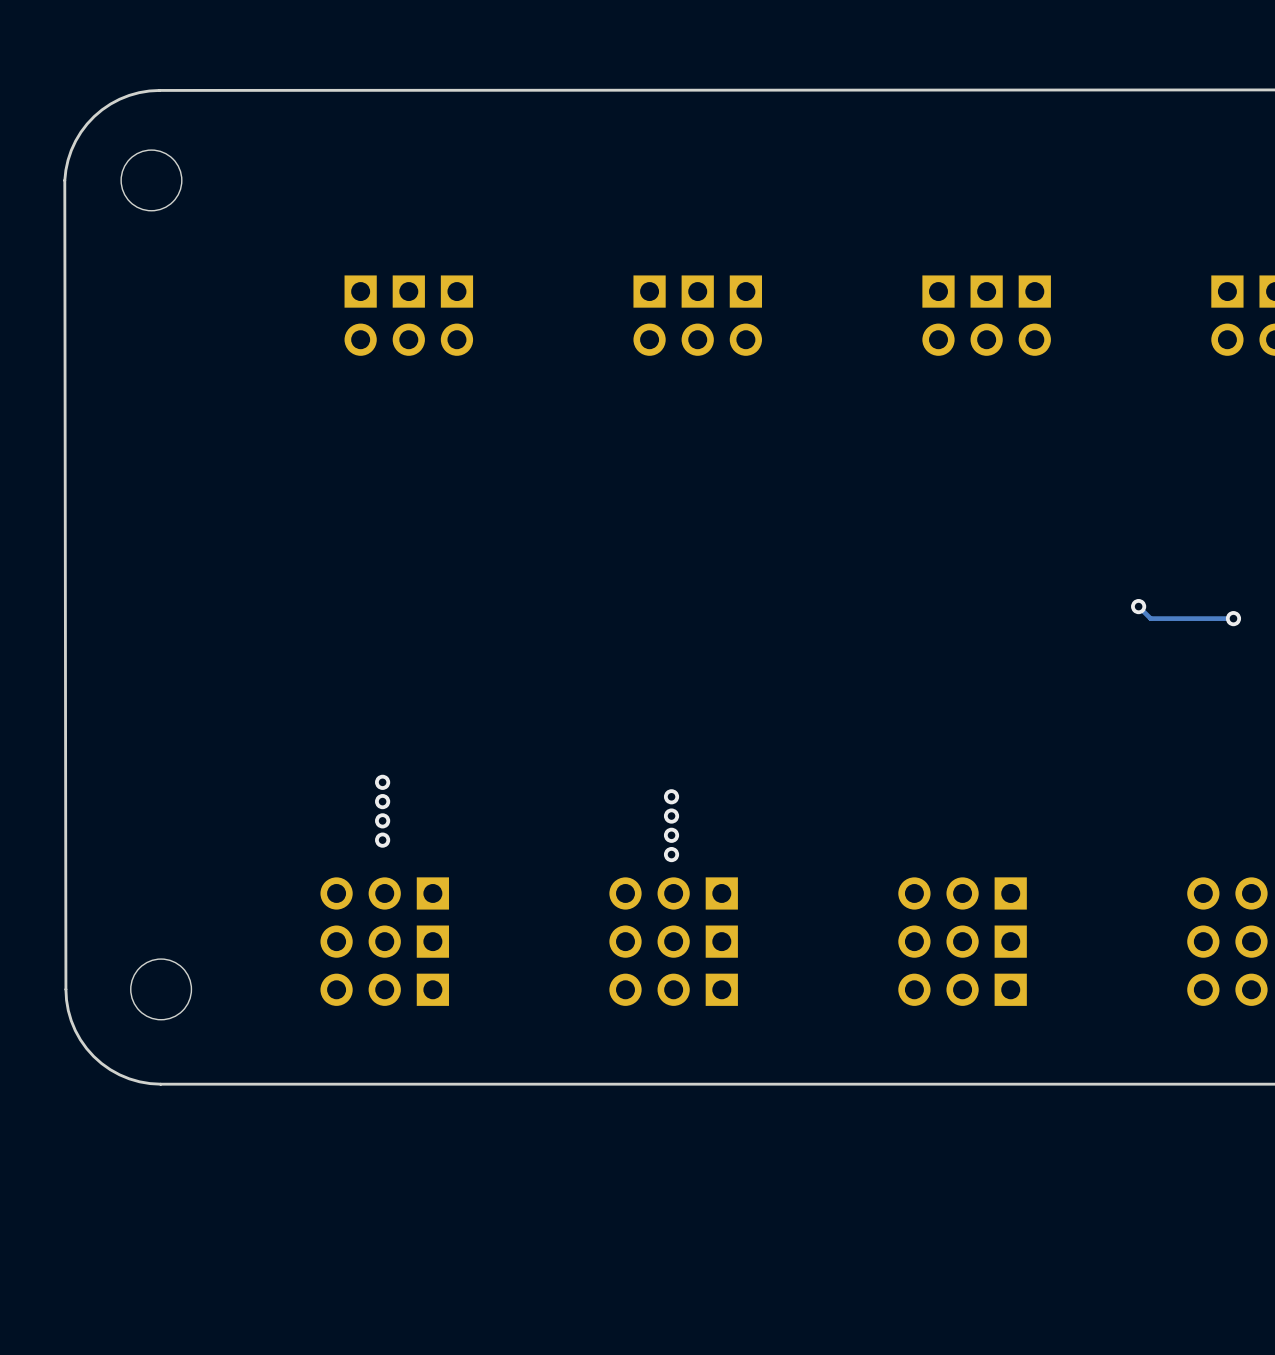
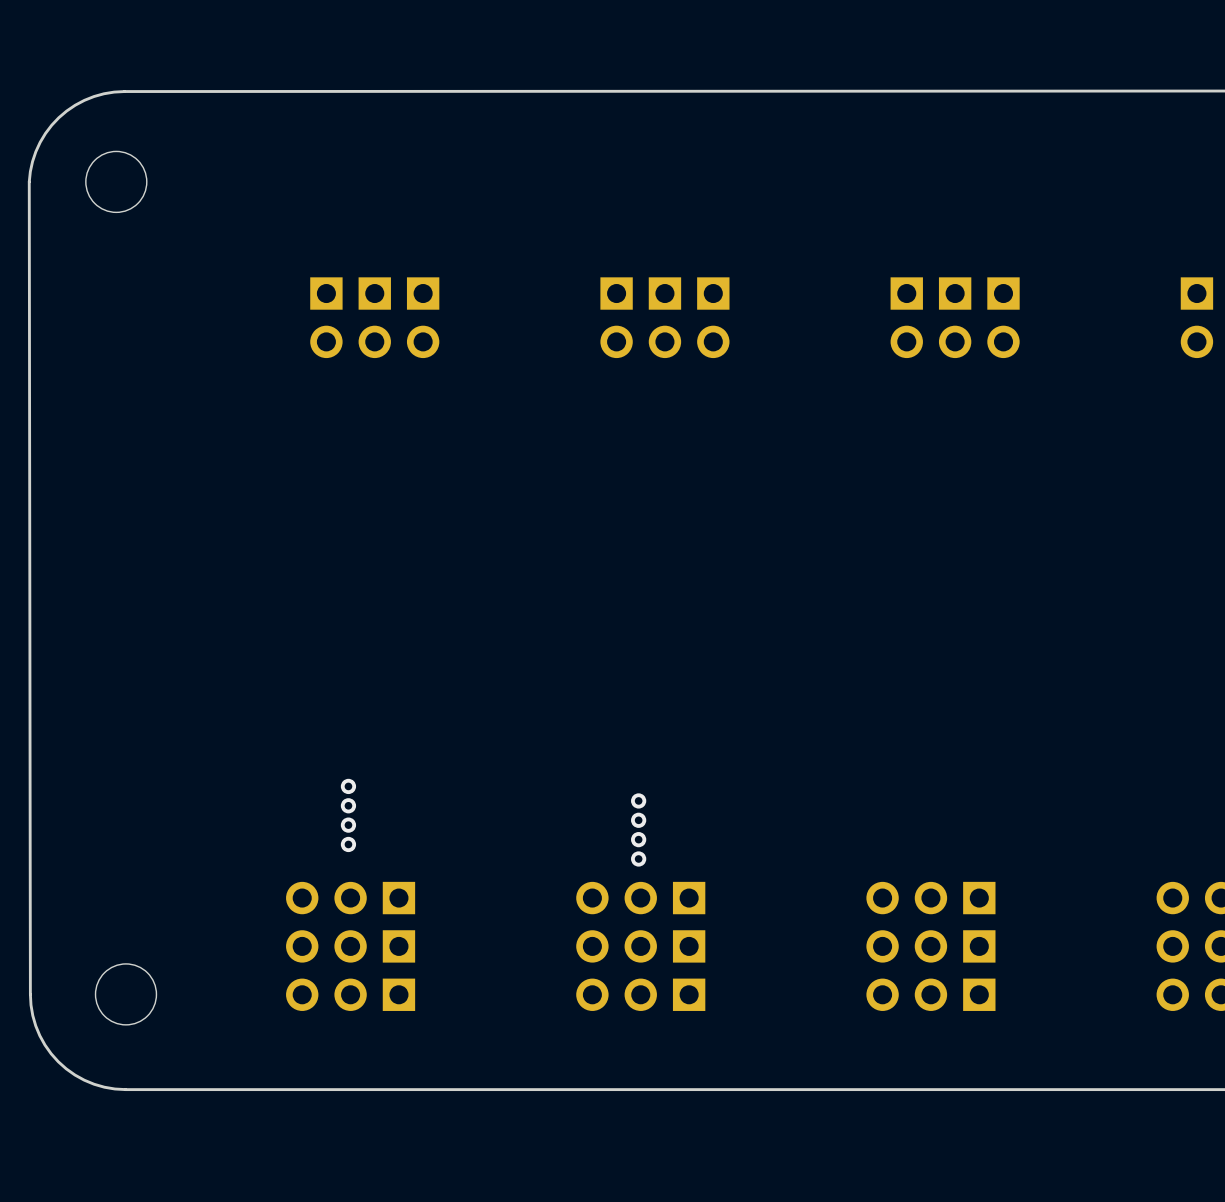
track: (1138, 606) (1150, 618) (1233, 618) -> none
via: (1138, 606) -> none
via: (1233, 618) -> none

